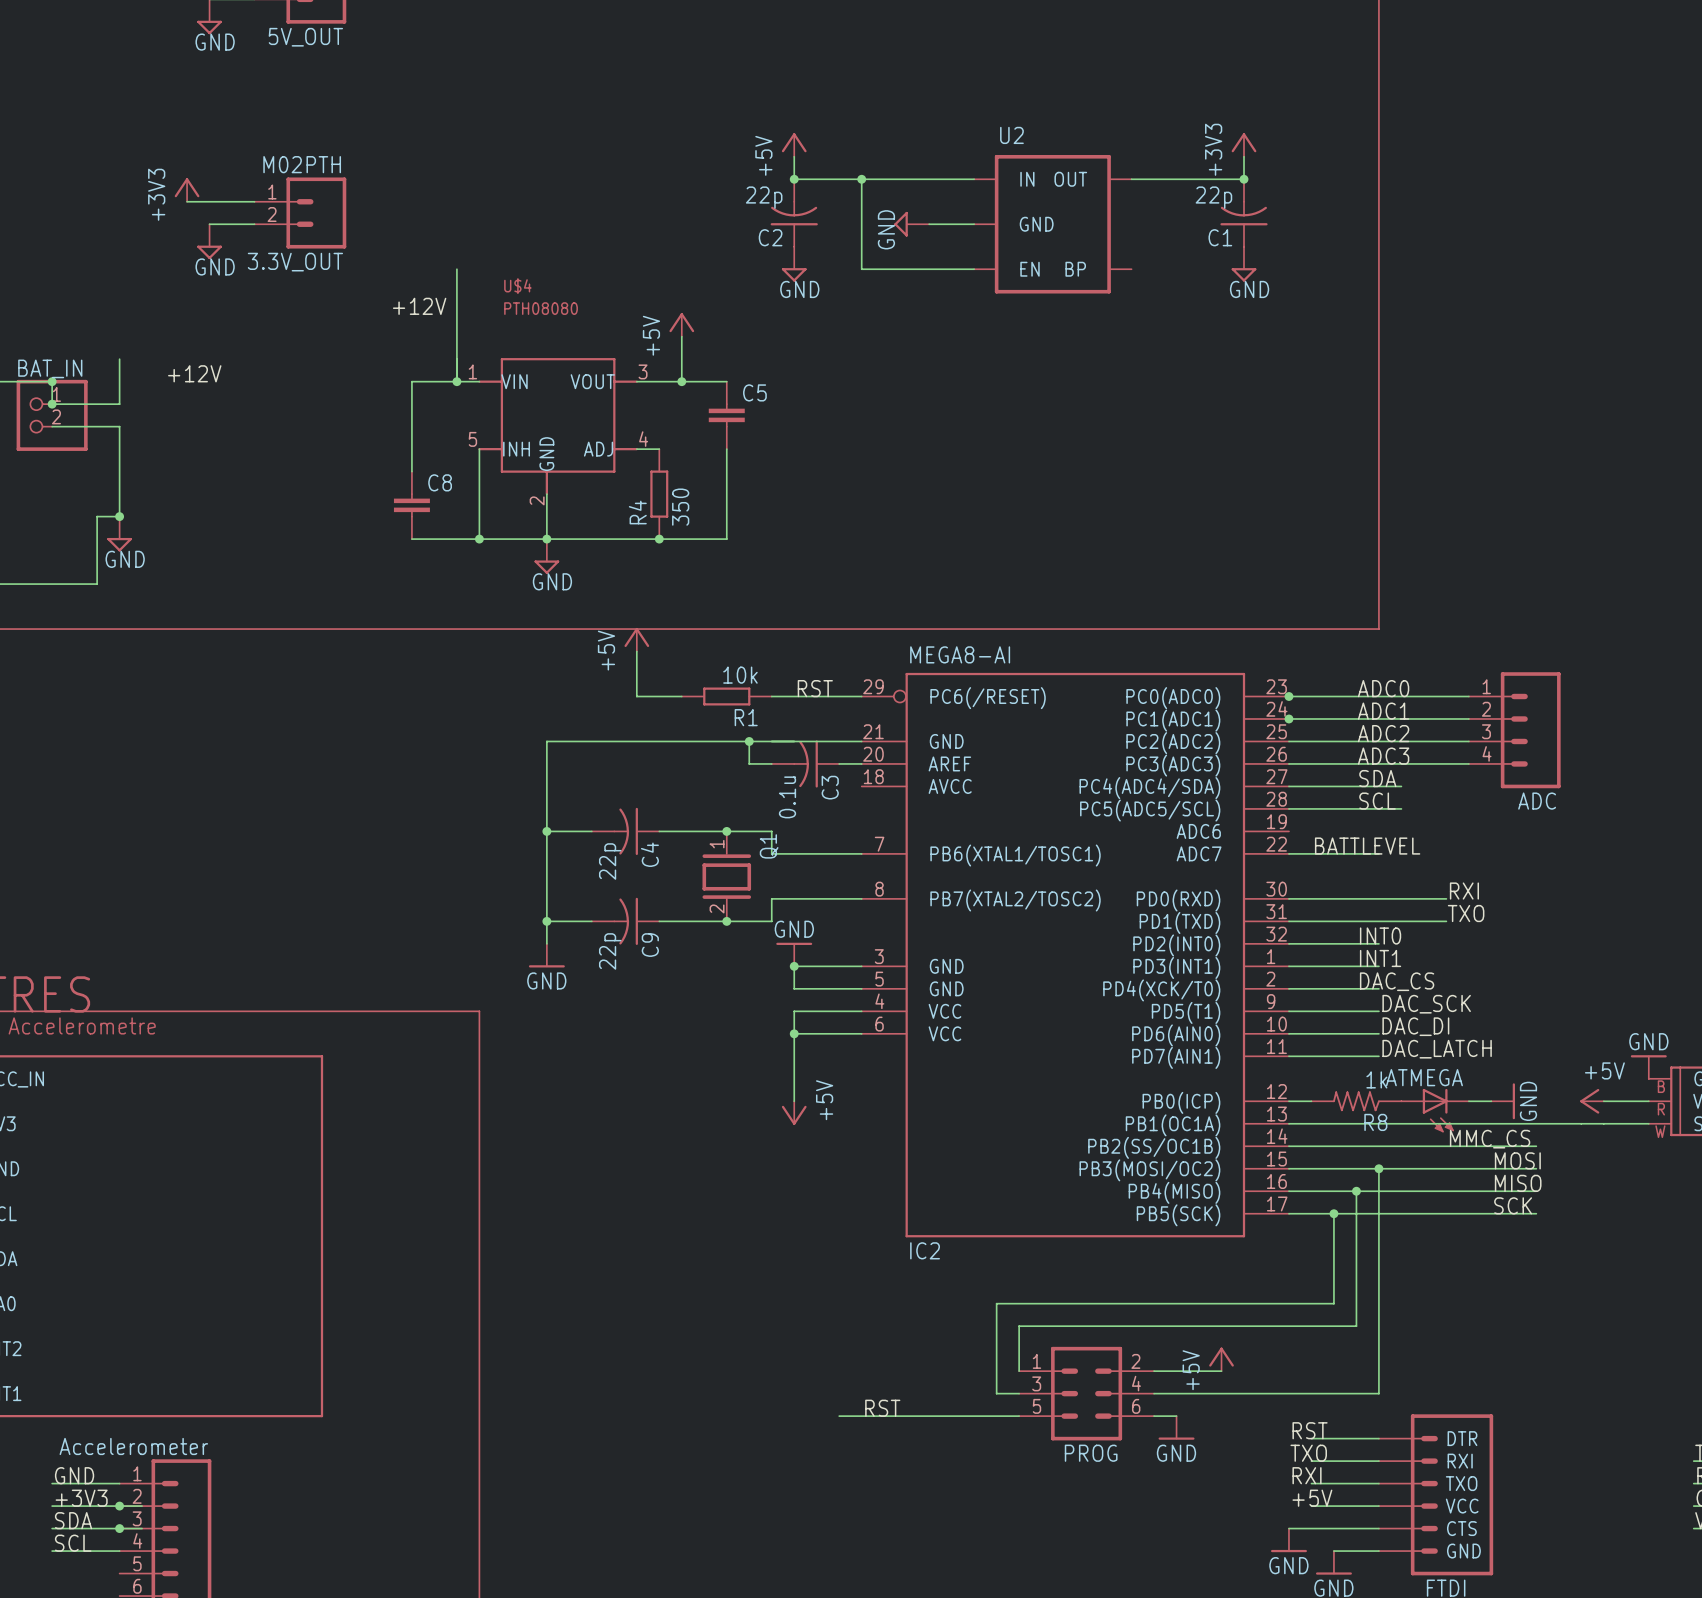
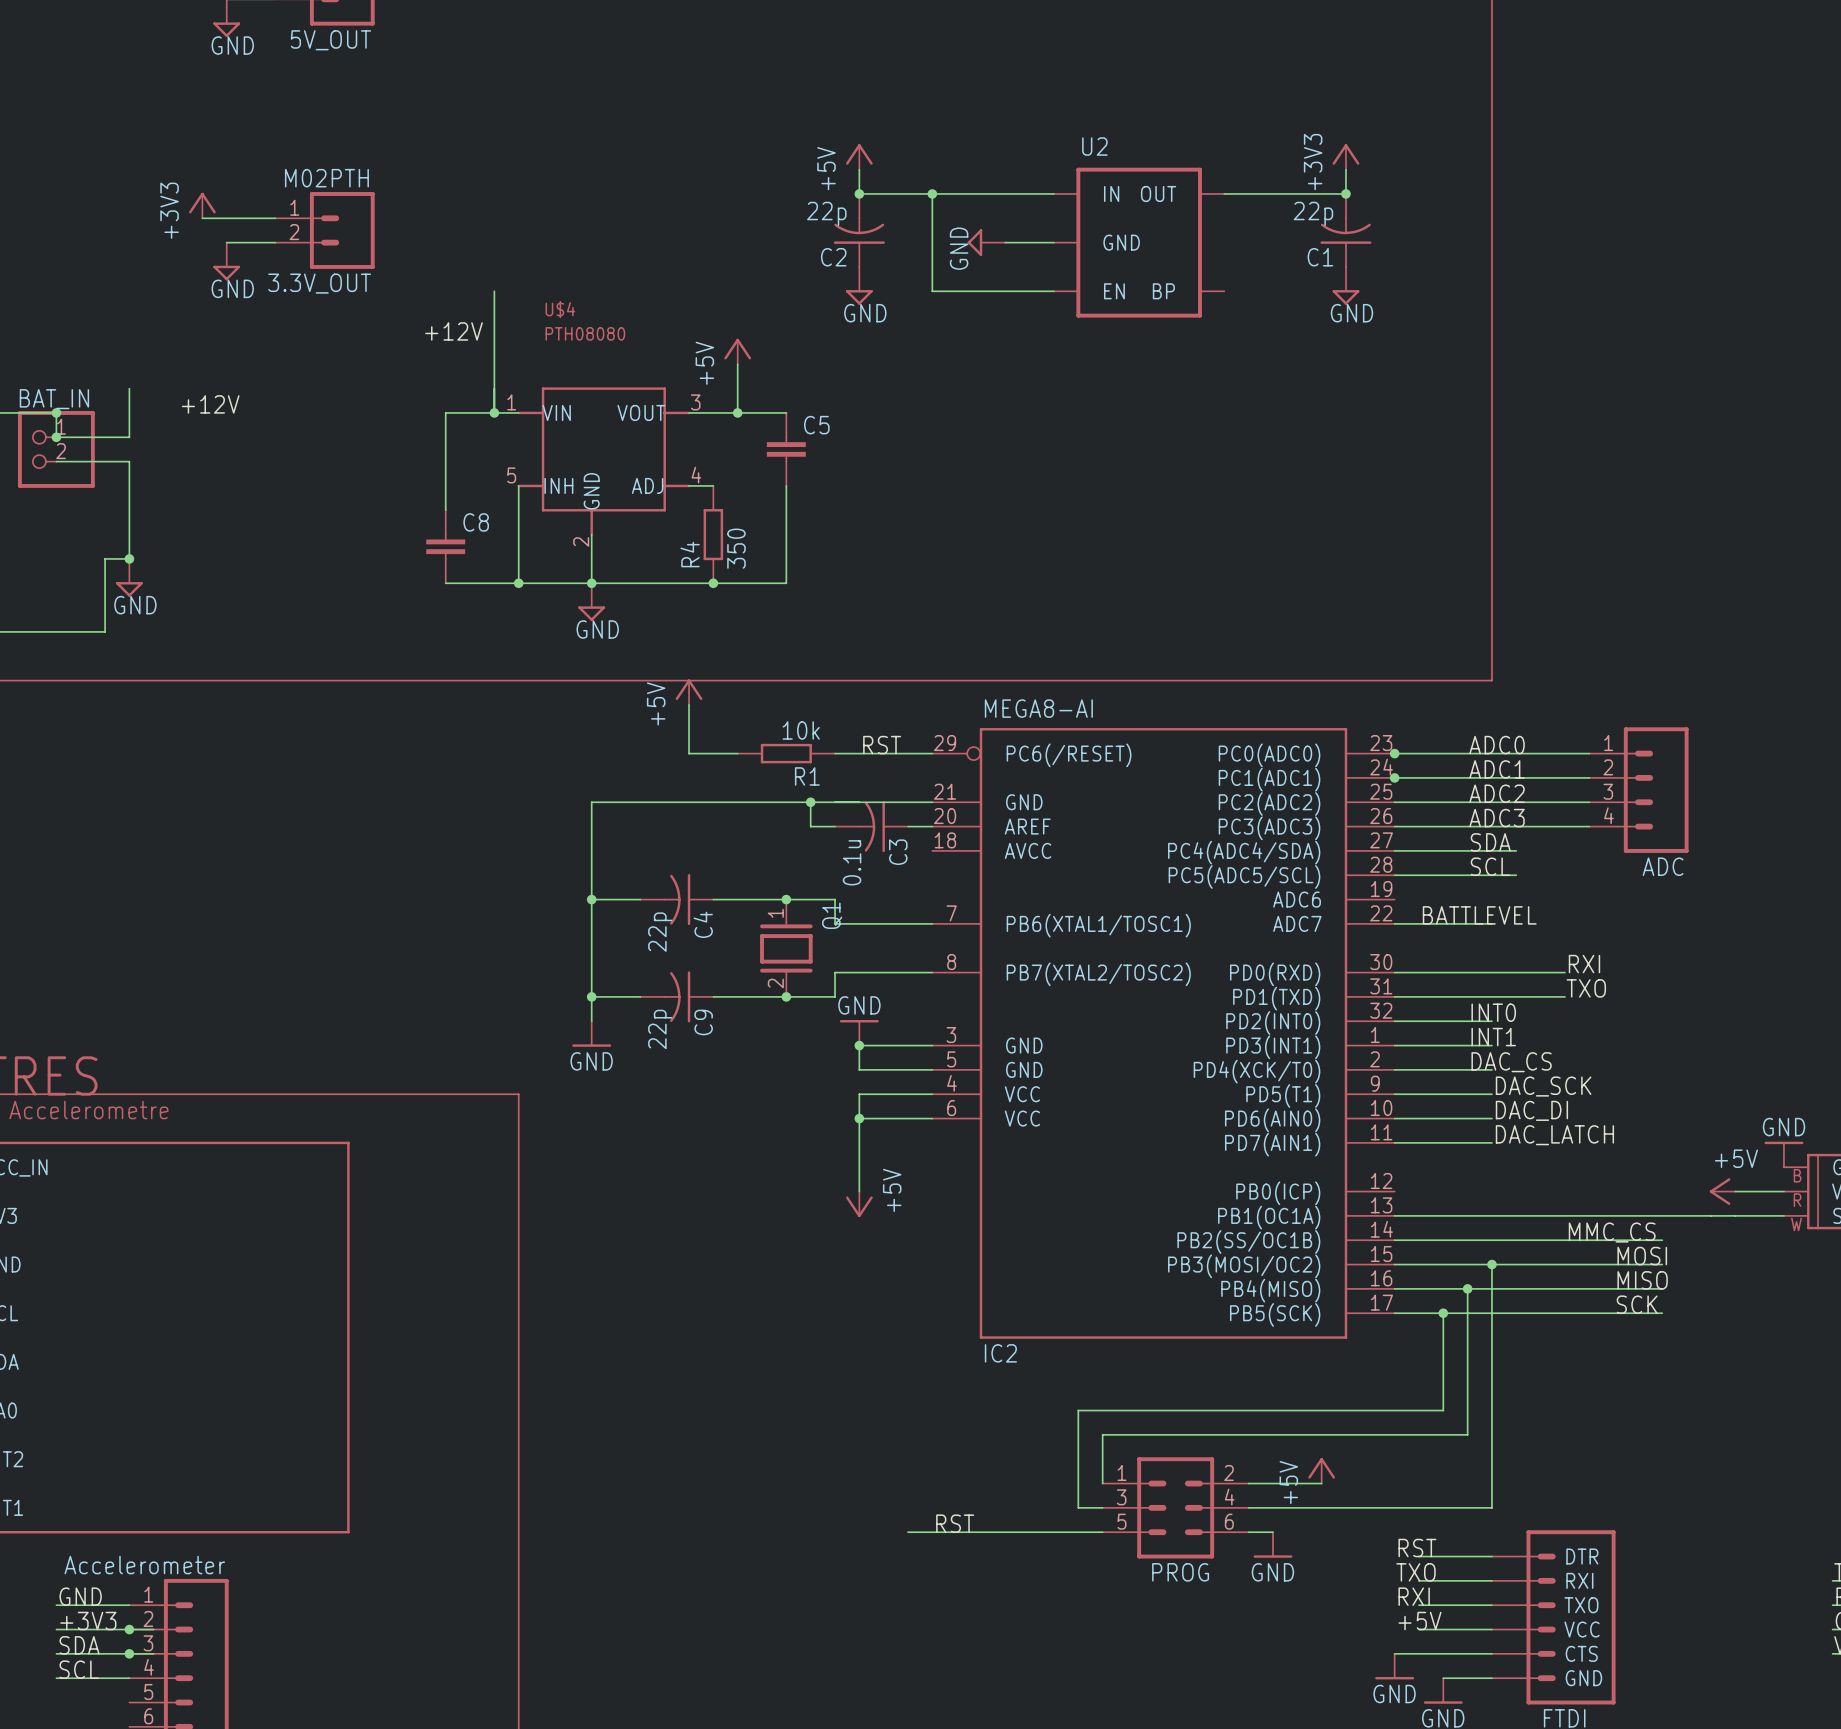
wire: (1288, 1101) (1311, 1101) -> none
R8: 1k (1356, 1101) -> none
wire: (1468, 1101) (1491, 1101) -> none
power symbol: GND (1503, 1101) -> none
ATMEGA: (1435, 1110) -> none

